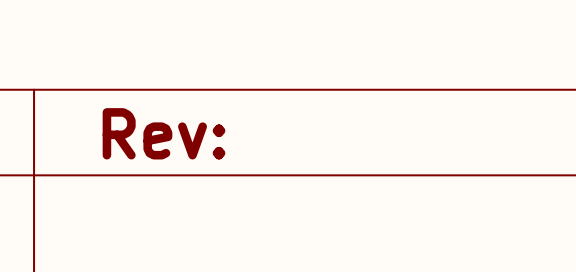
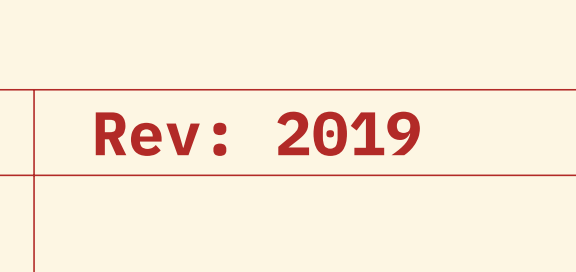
title block: Rev: (163, 133) -> Rev: 2019 (257, 133)

